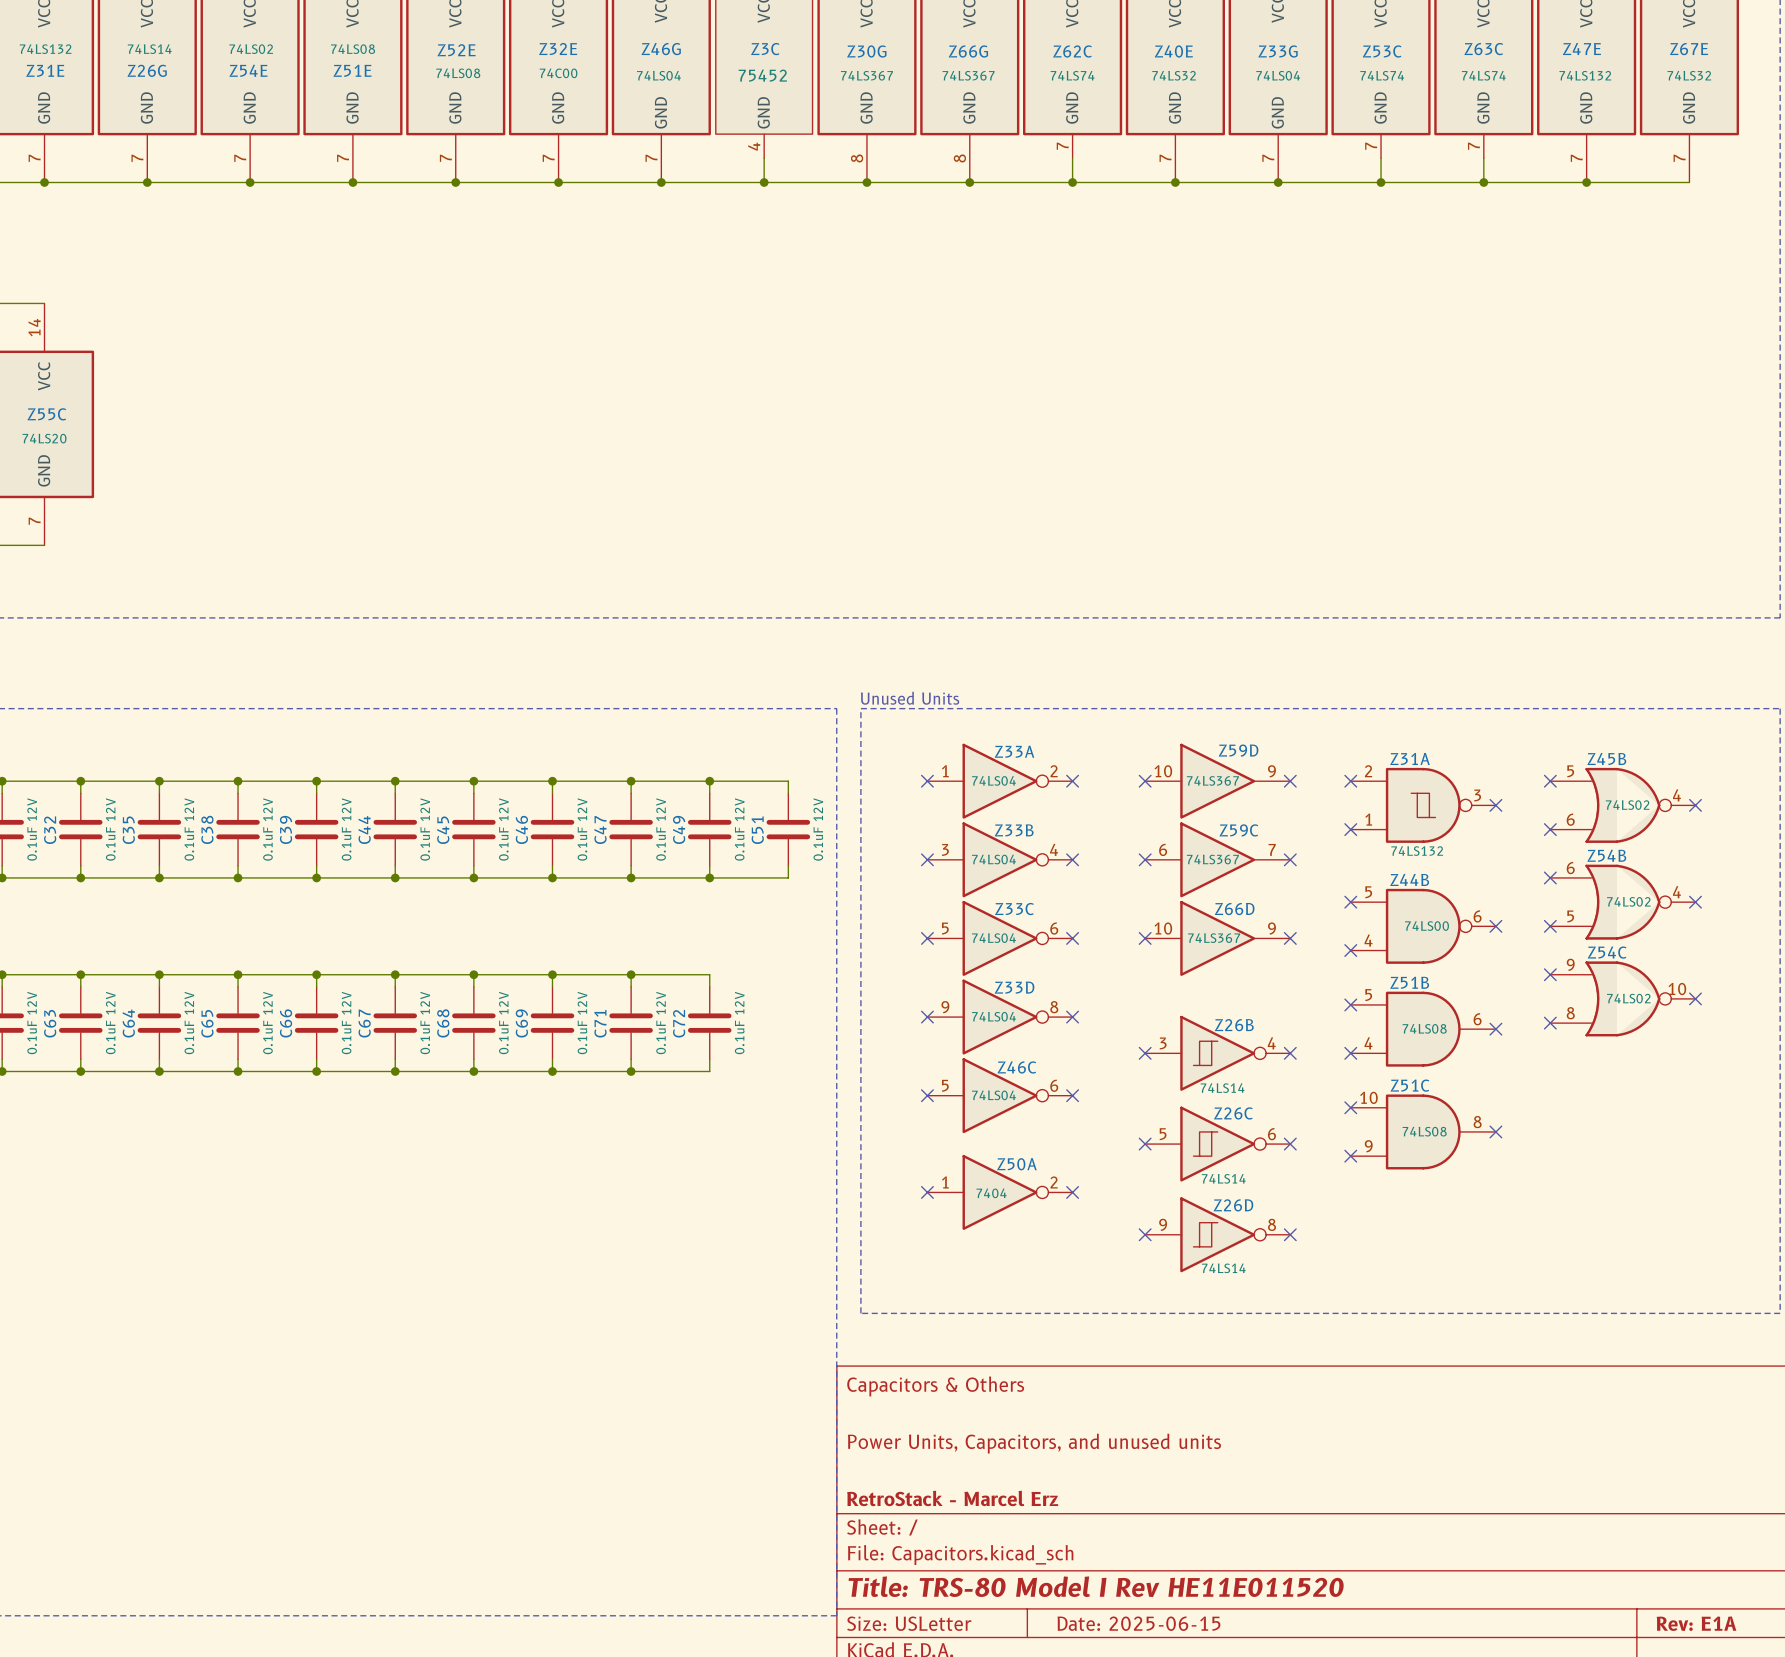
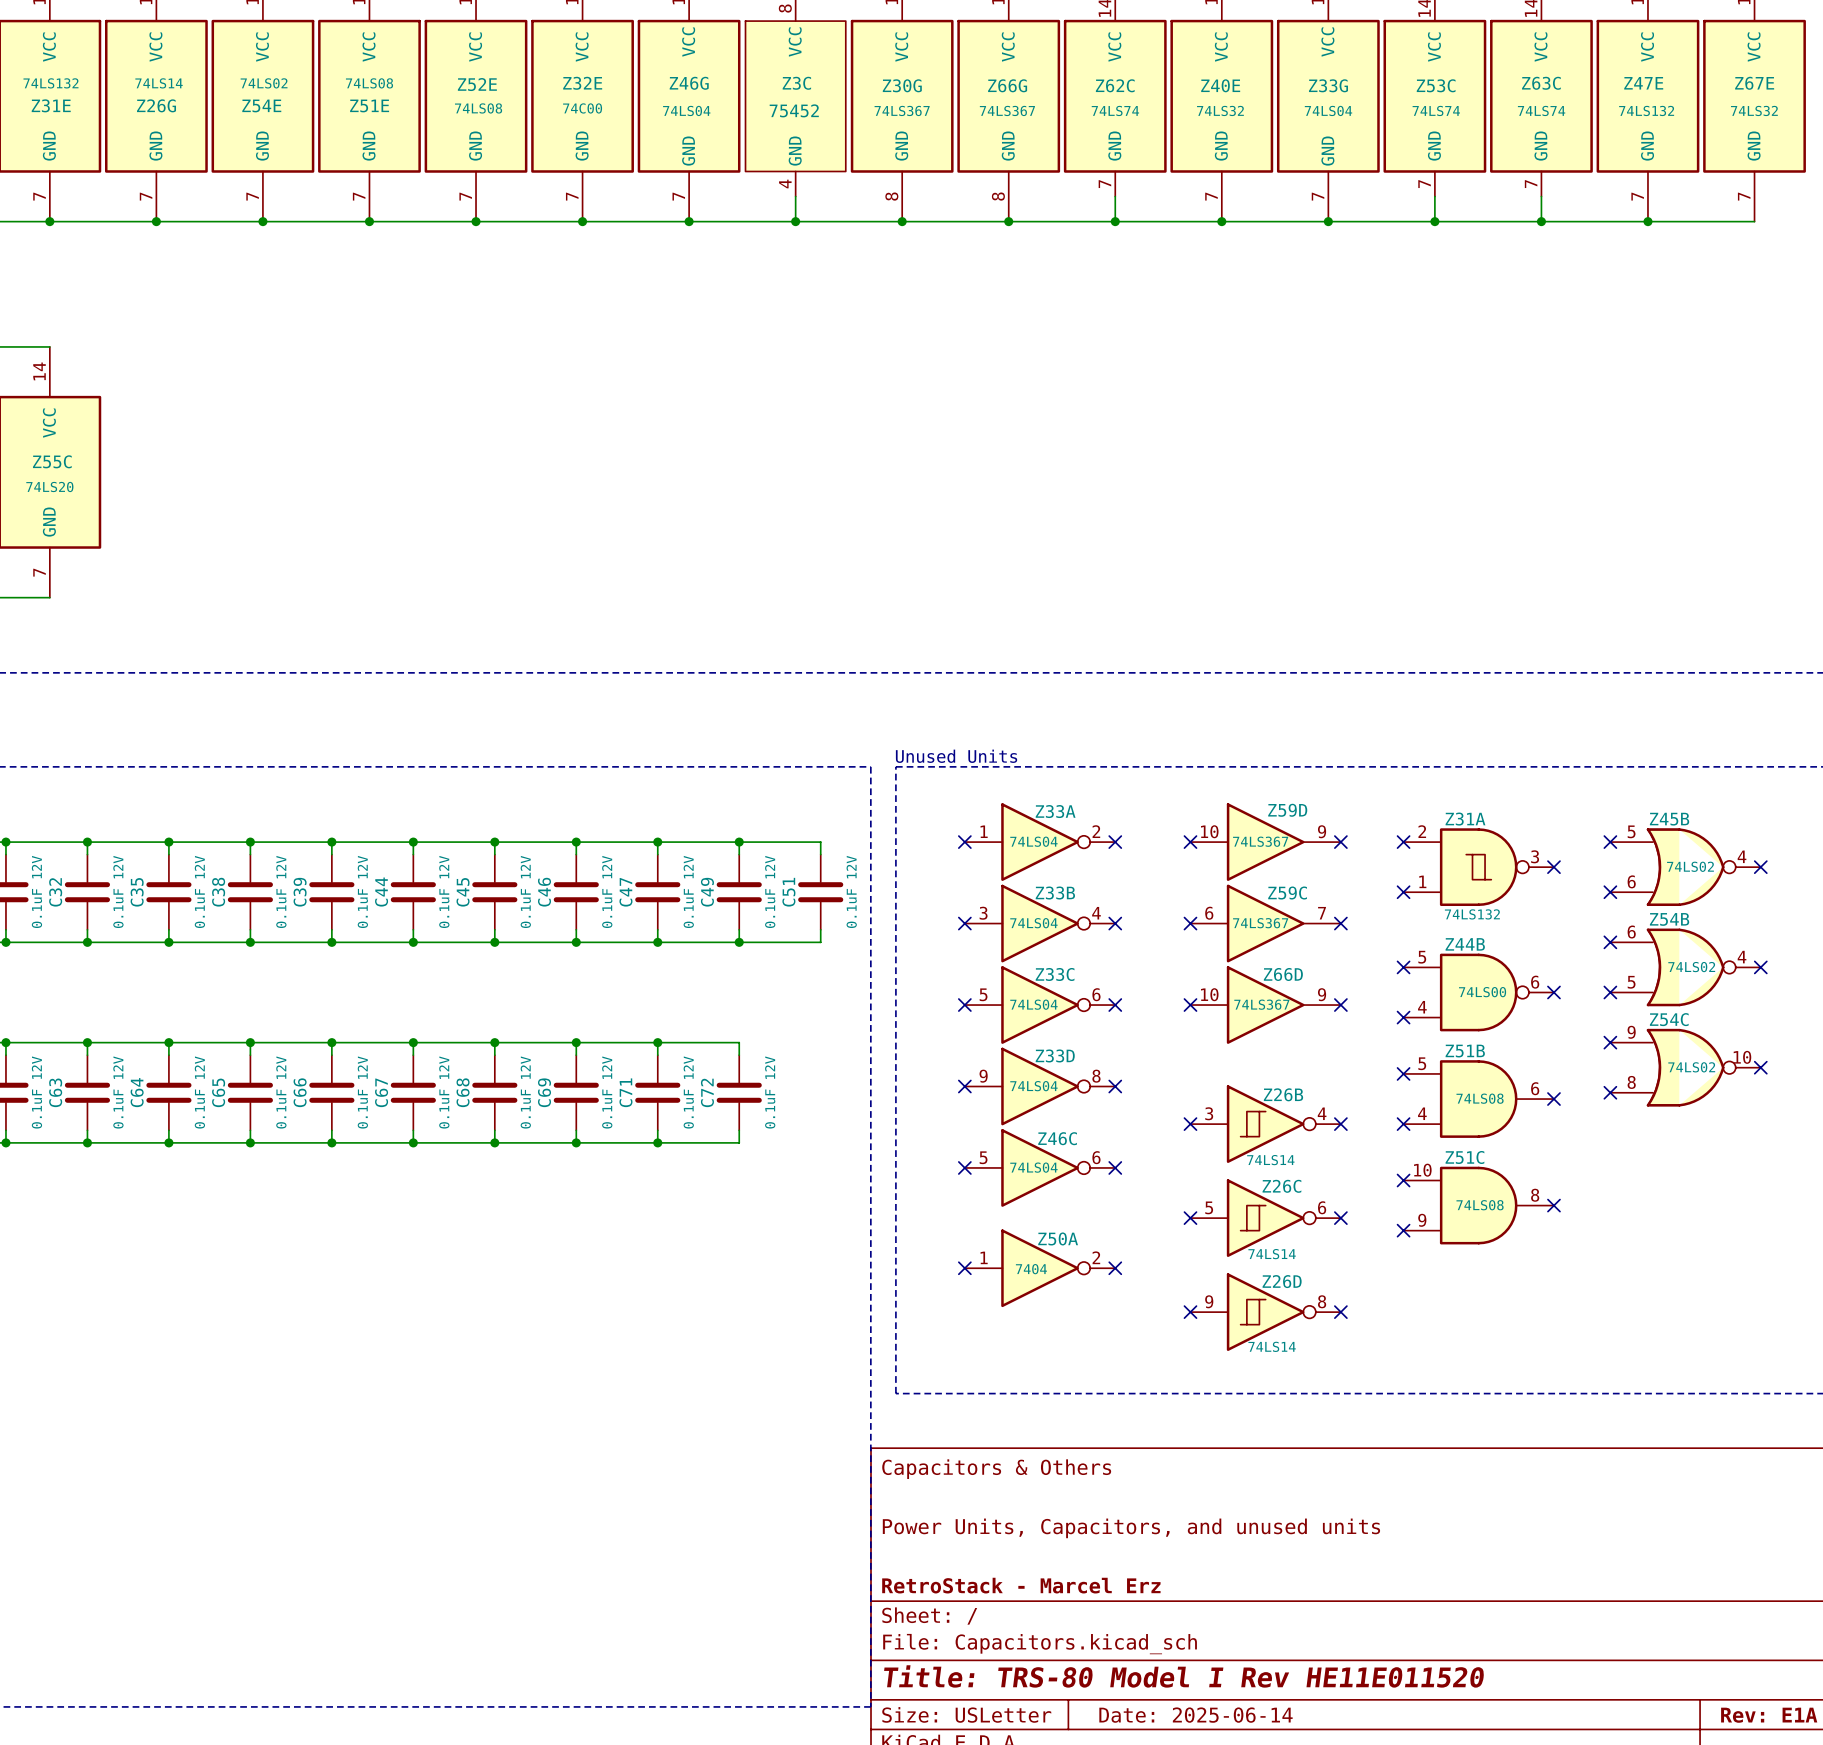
title block: Date: 2025-06-15 (1138, 1623) -> Date: 2025-06-14 (1195, 1715)

